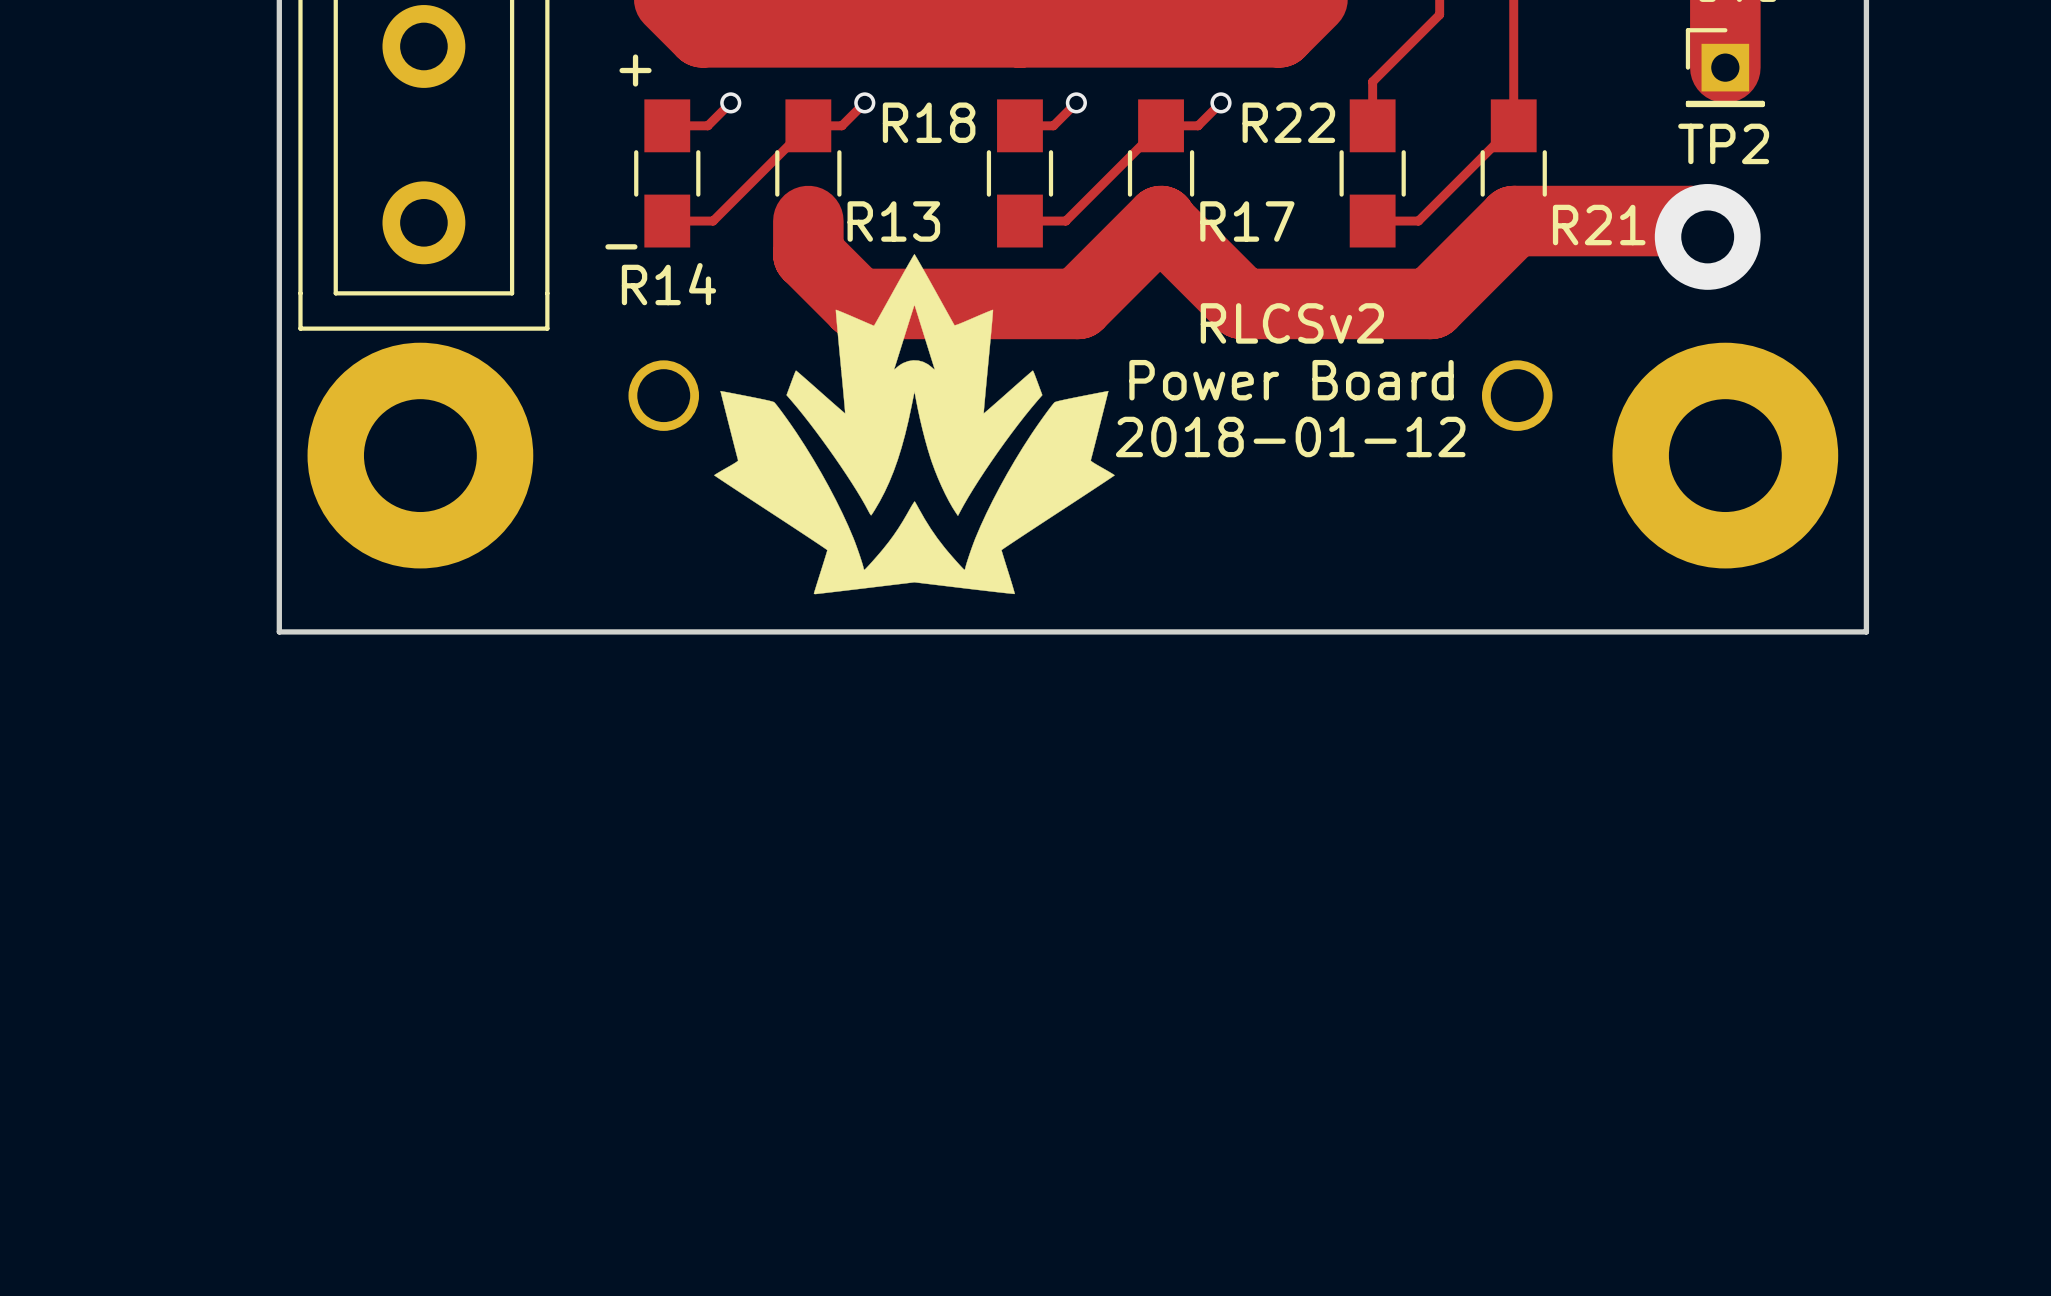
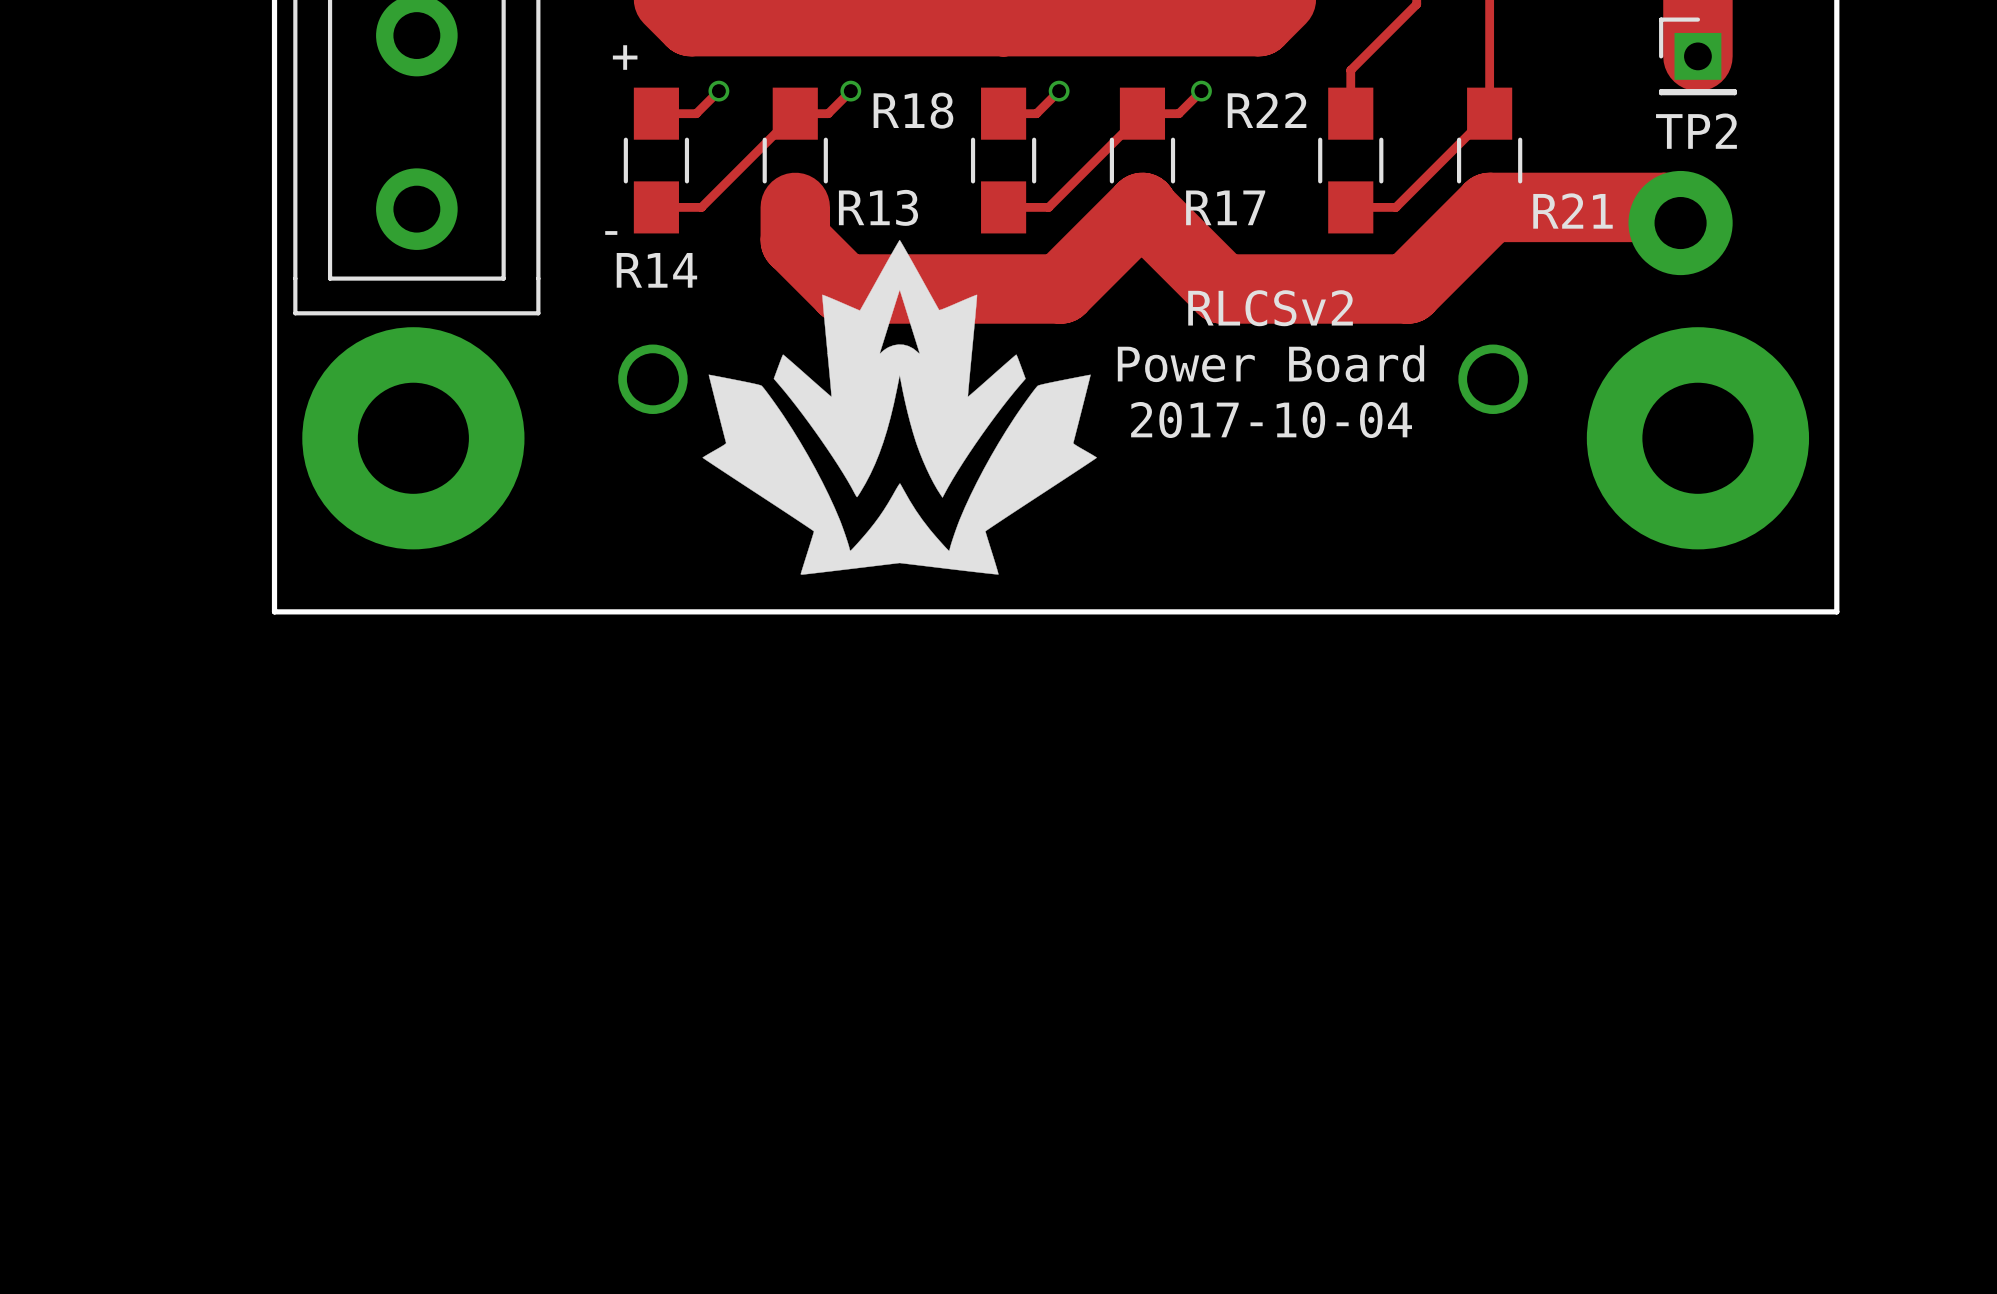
text: 2018-01-12 (1290, 436) -> 2017-10-04 (1271, 420)

